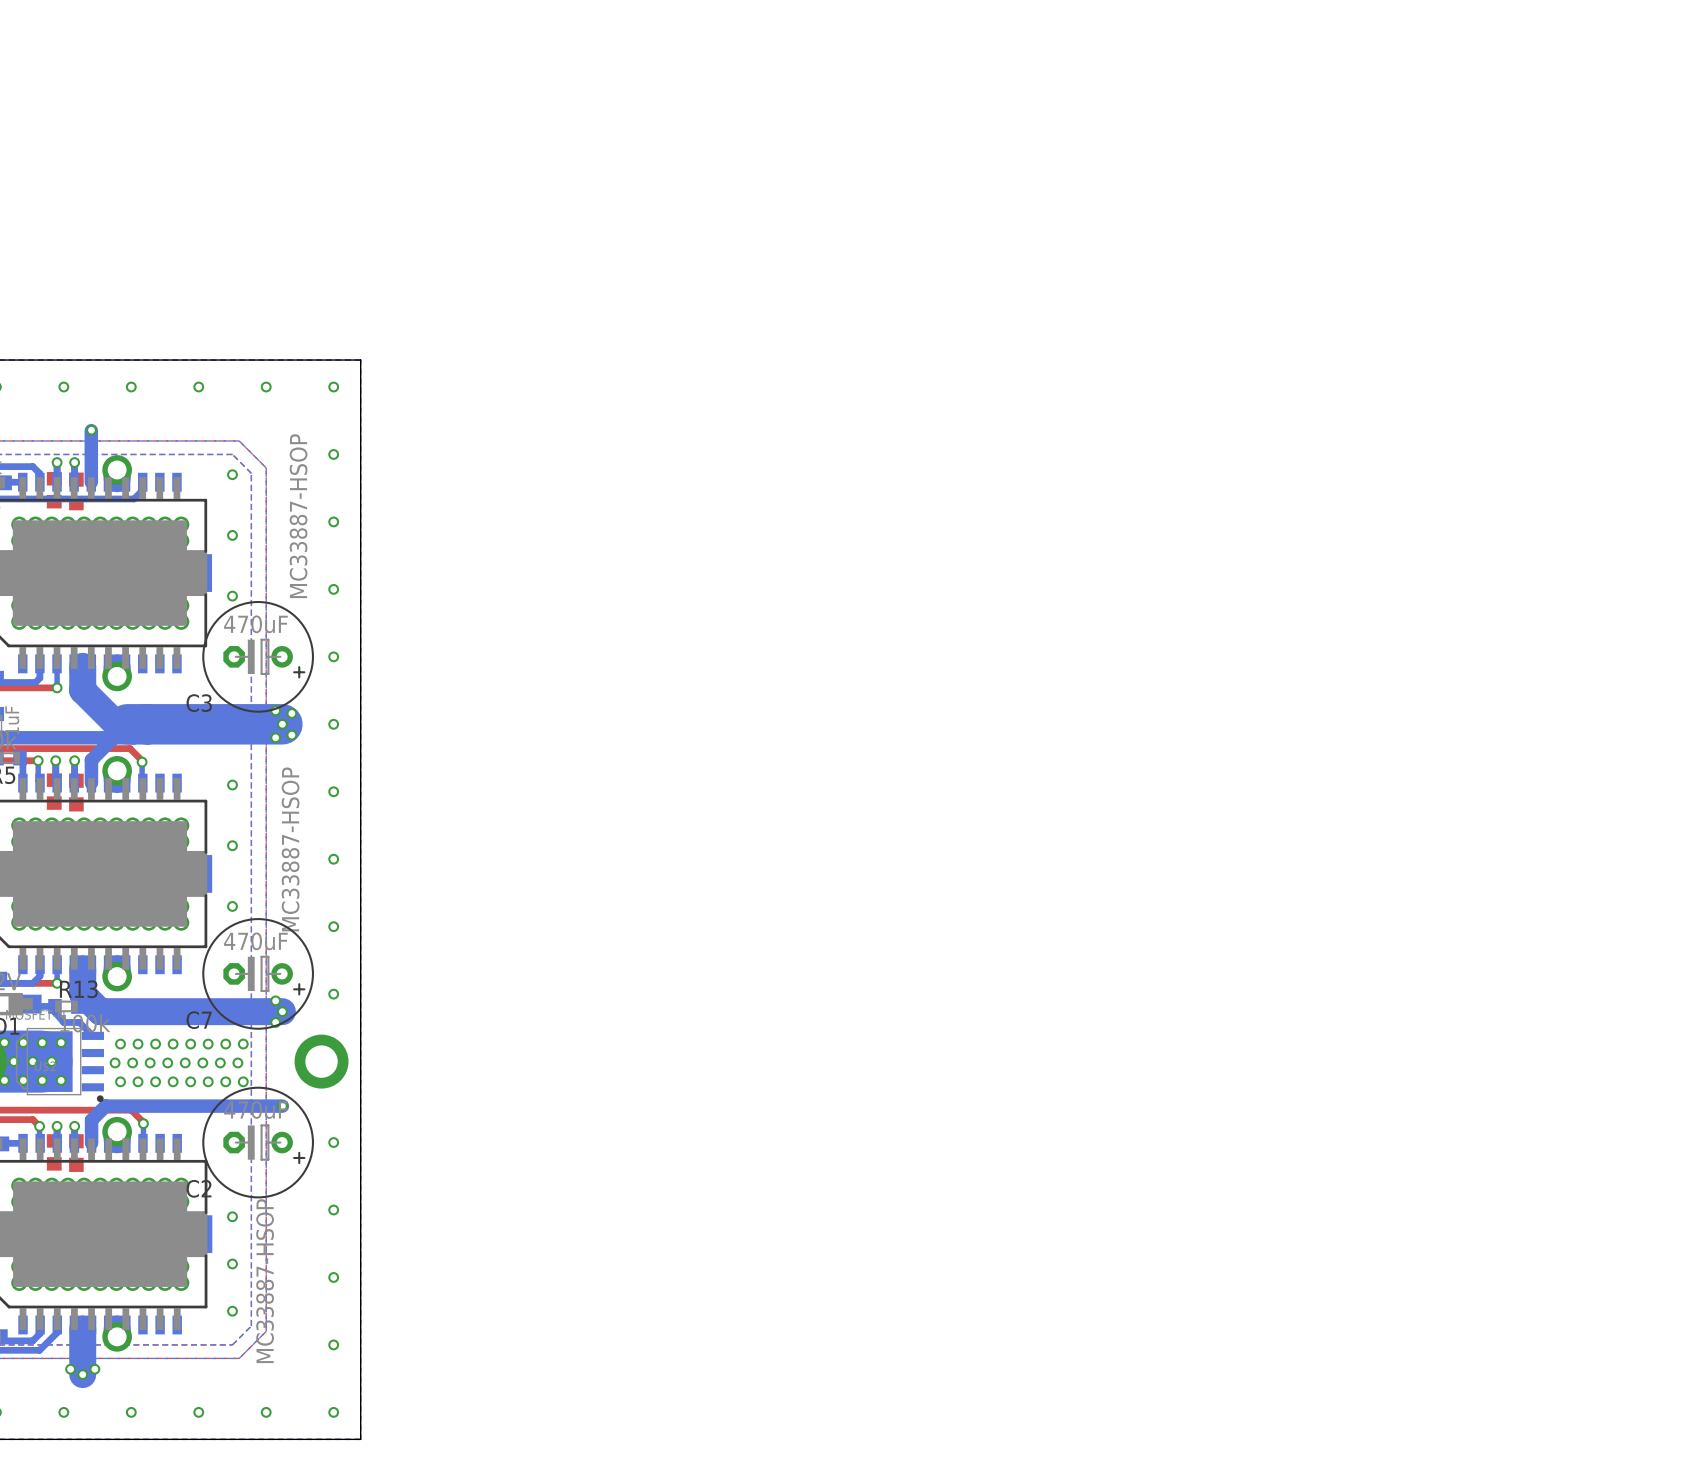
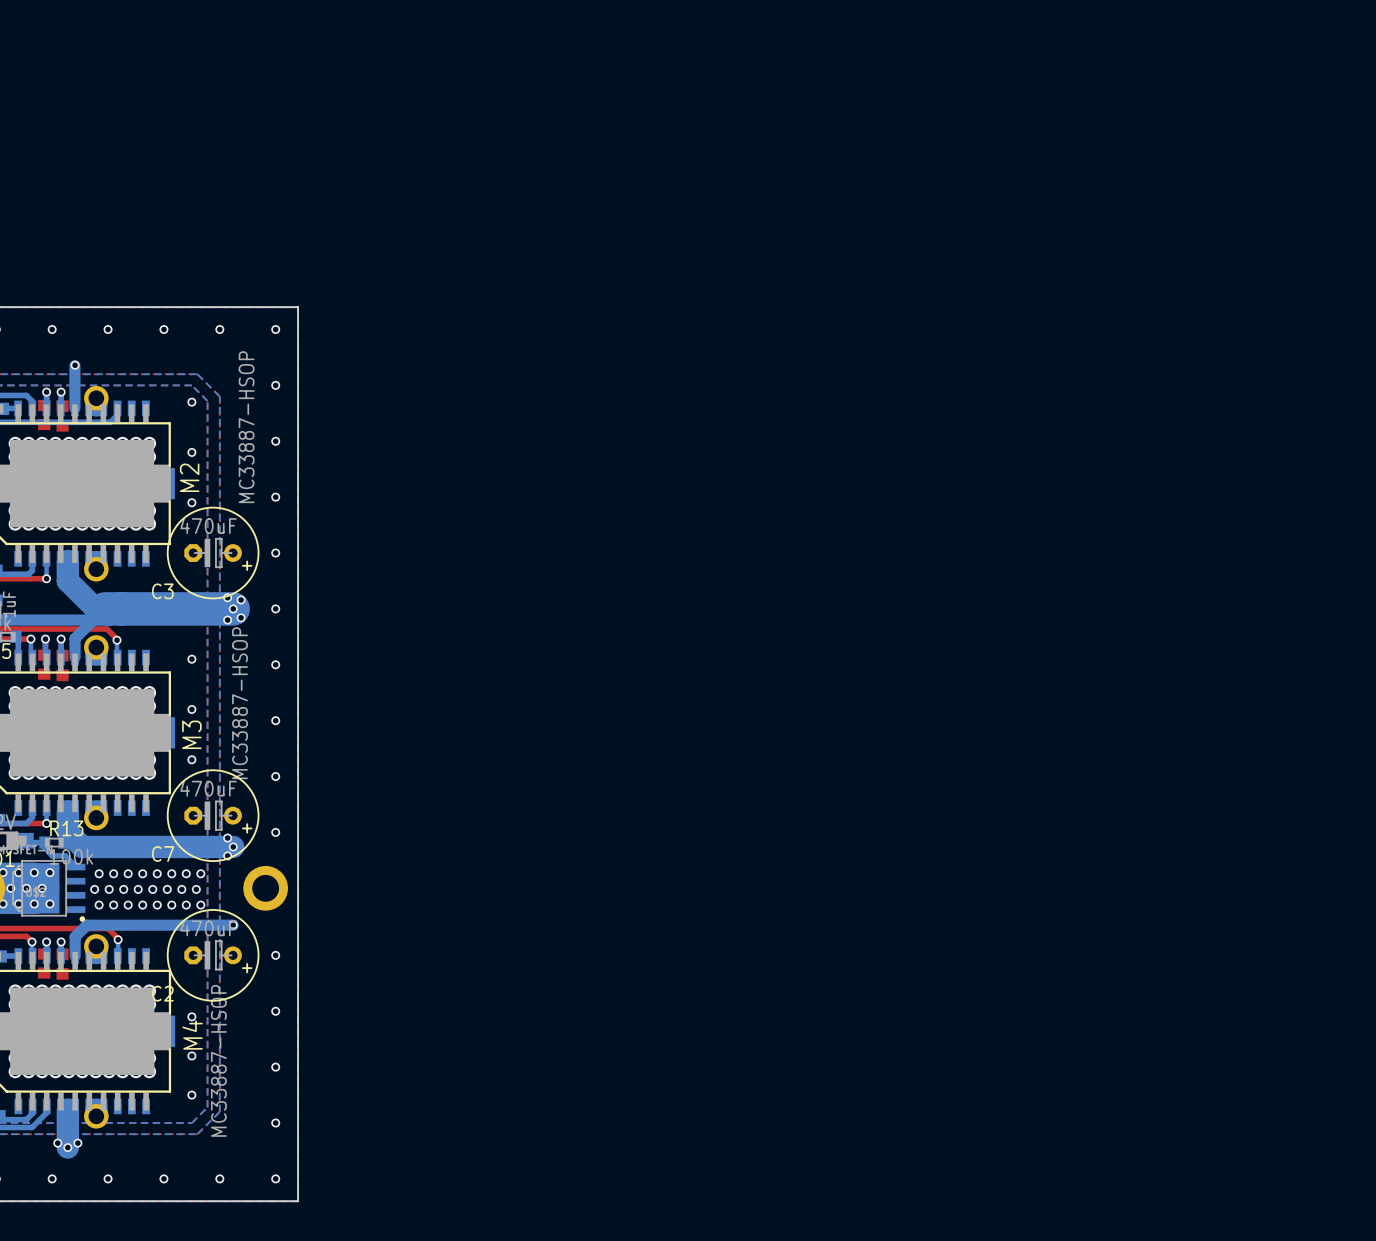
text: none -> M2 (189, 477)
text: none -> M3 (191, 734)
text: none -> M4 (192, 1035)

